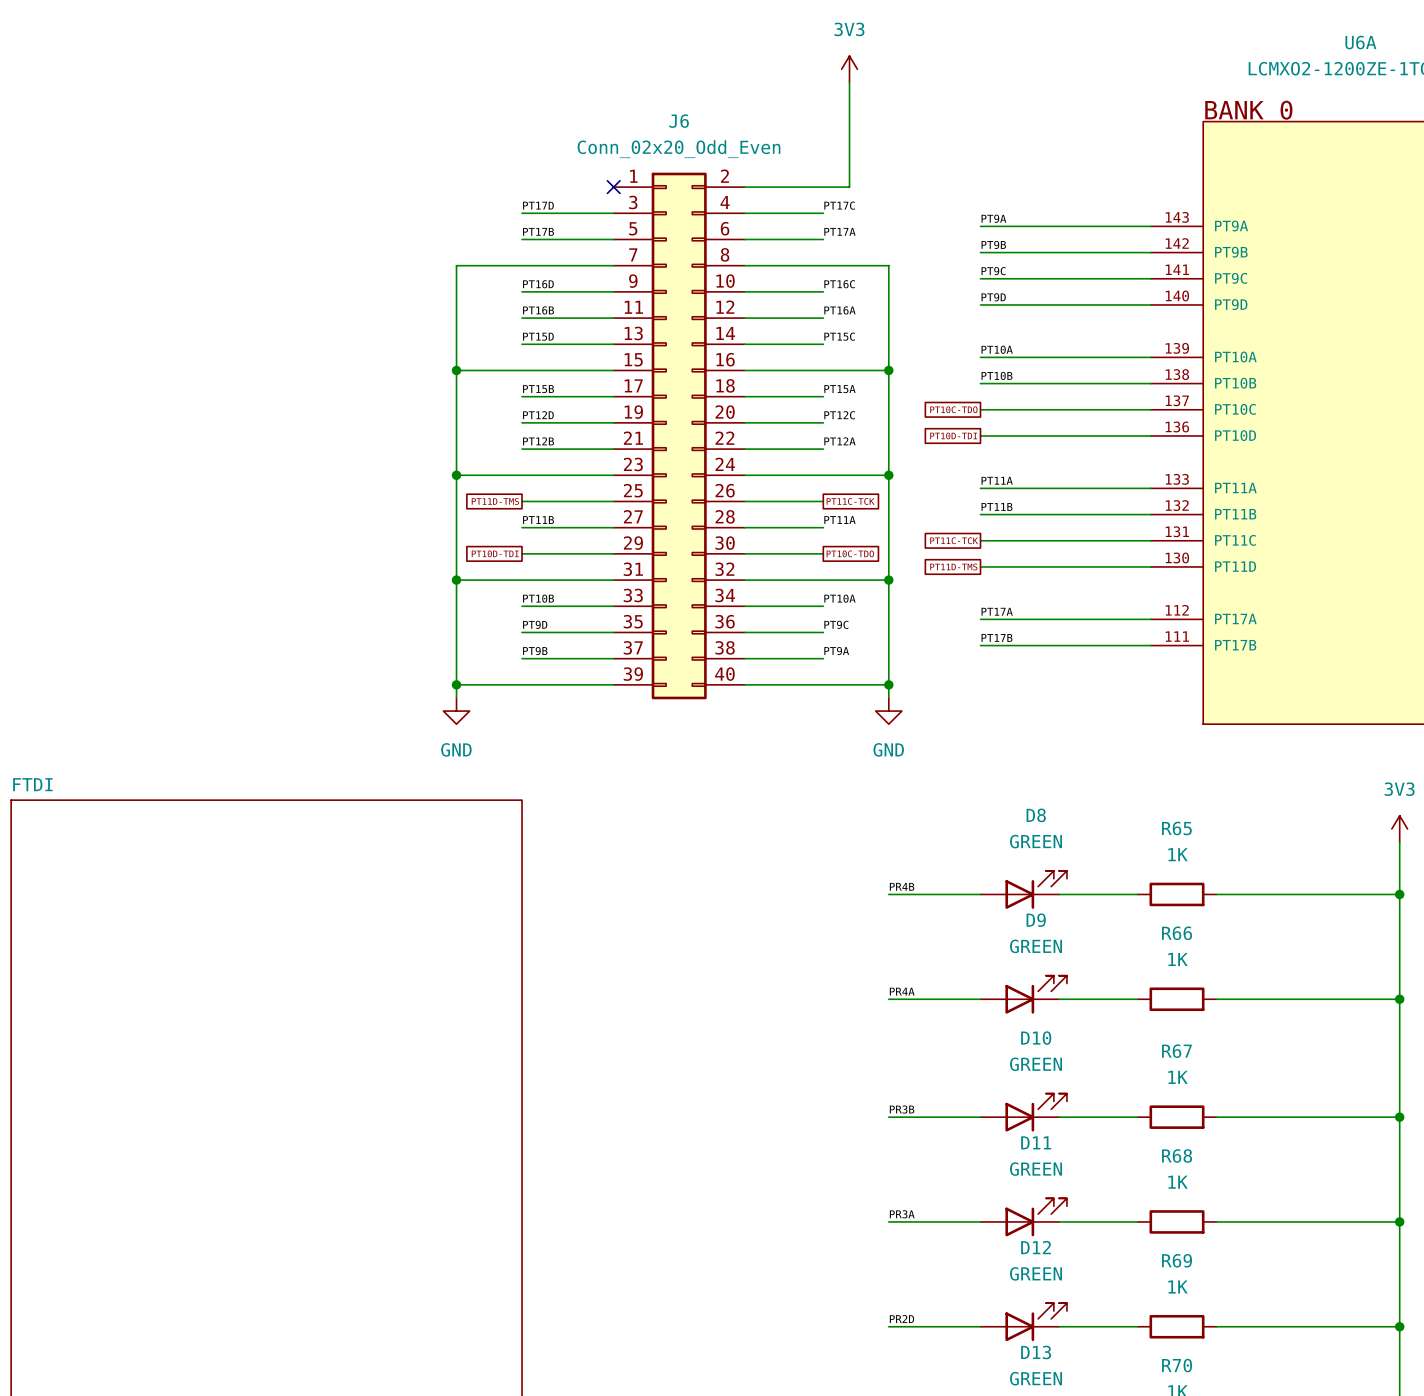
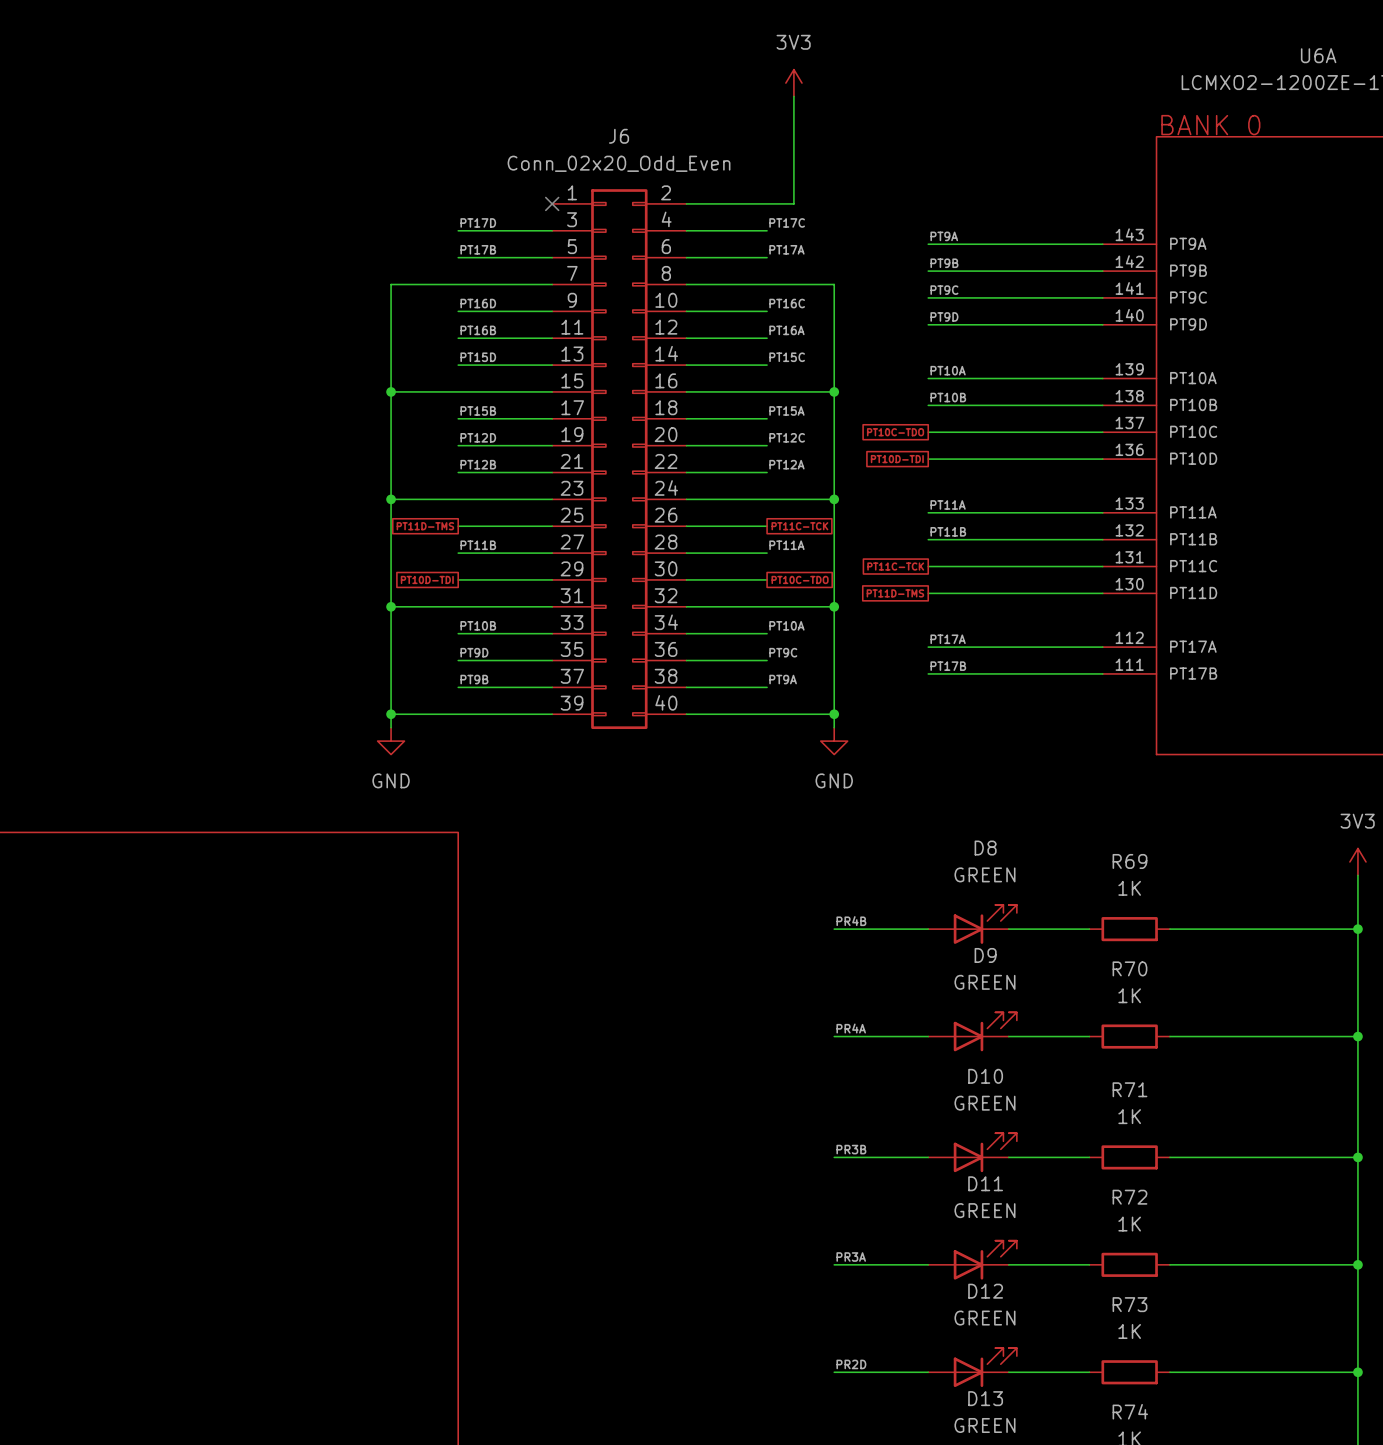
R65 name: R65 (1176, 828) -> R69 (1129, 861)
R66 name: R66 (1177, 933) -> R70 (1129, 968)
R67 name: R67 (1176, 1051) -> R71 (1129, 1089)
R68 name: R68 (1177, 1155) -> R72 (1129, 1197)
R69 name: R69 (1177, 1260) -> R73 (1129, 1304)
R70 name: R70 (1177, 1365) -> R74 (1130, 1411)

